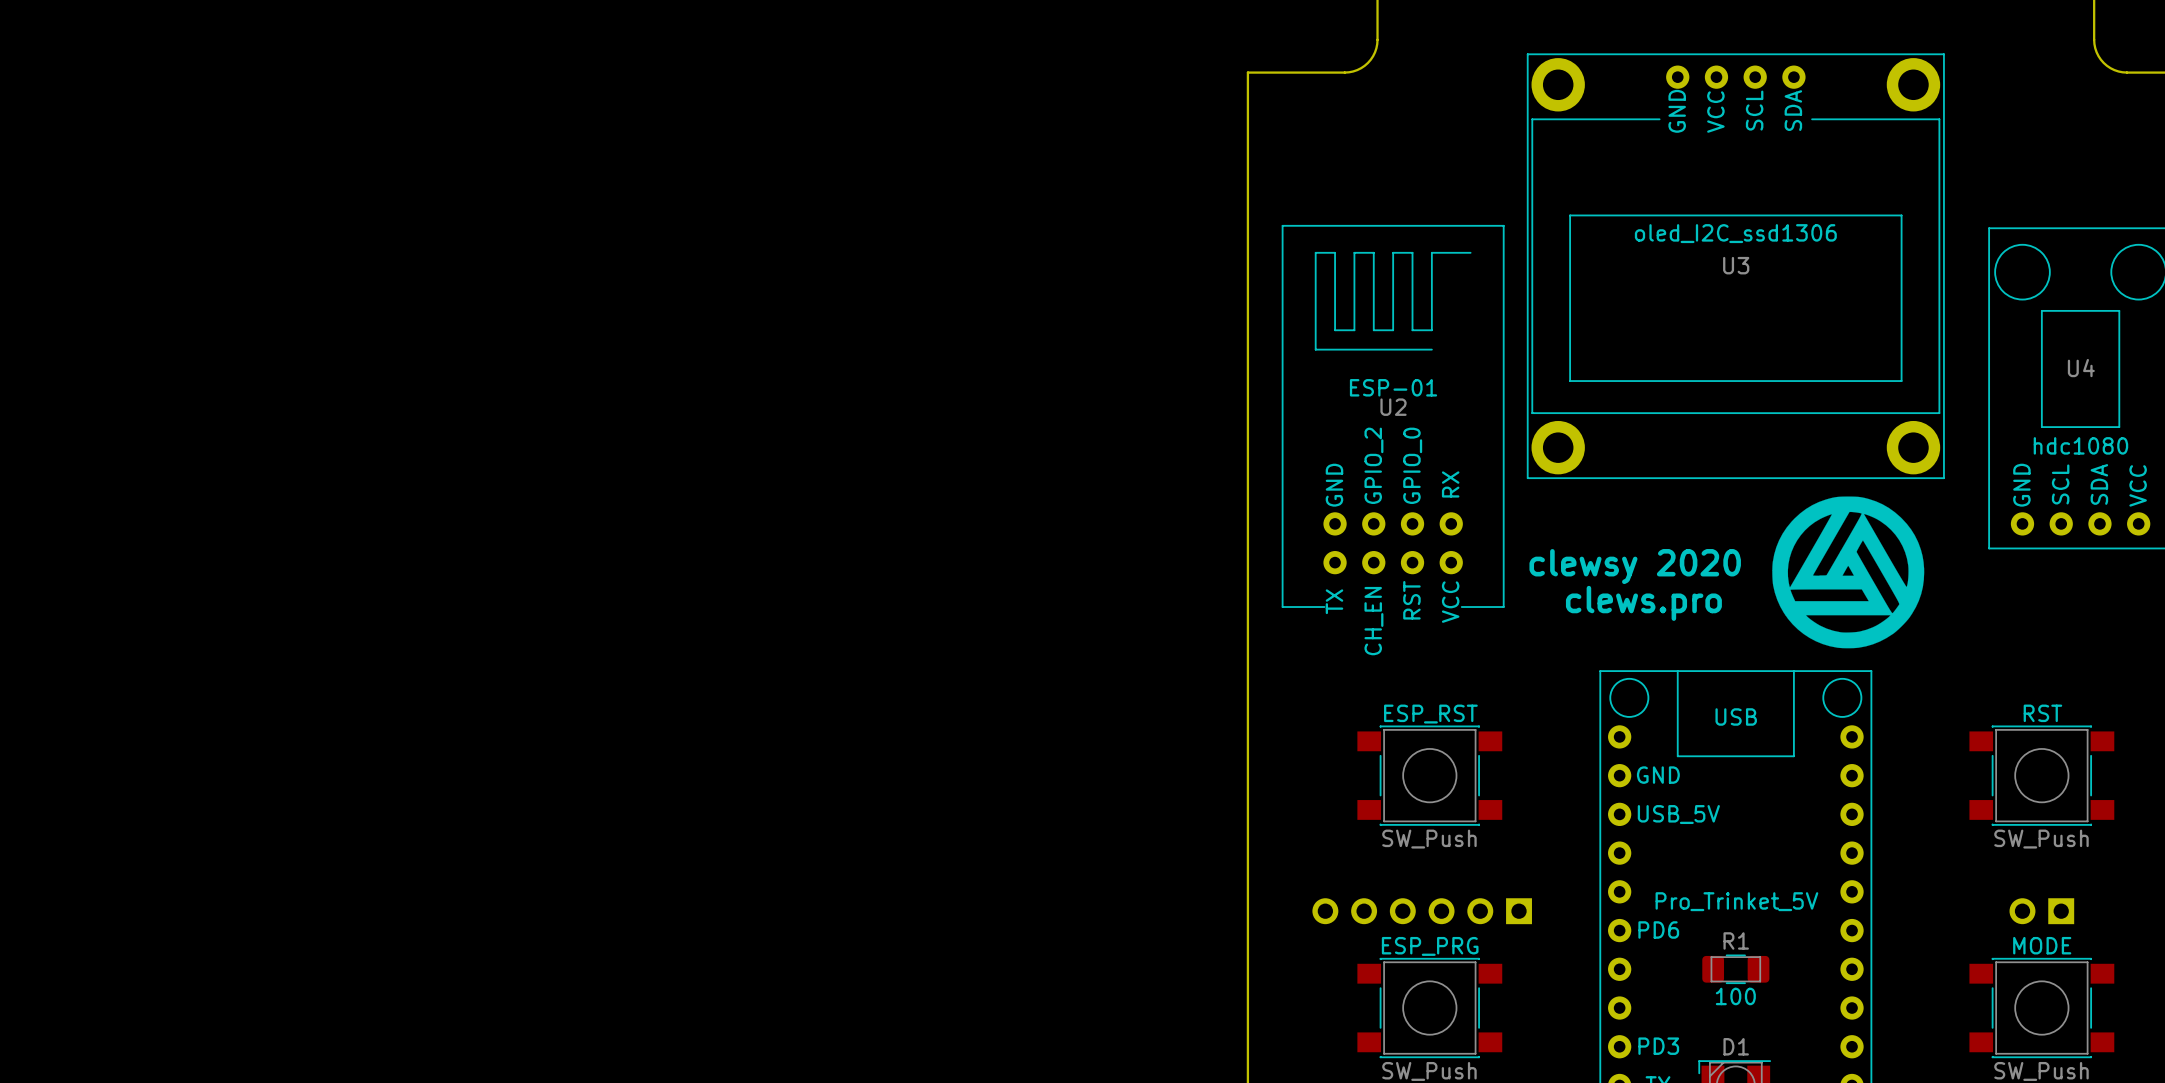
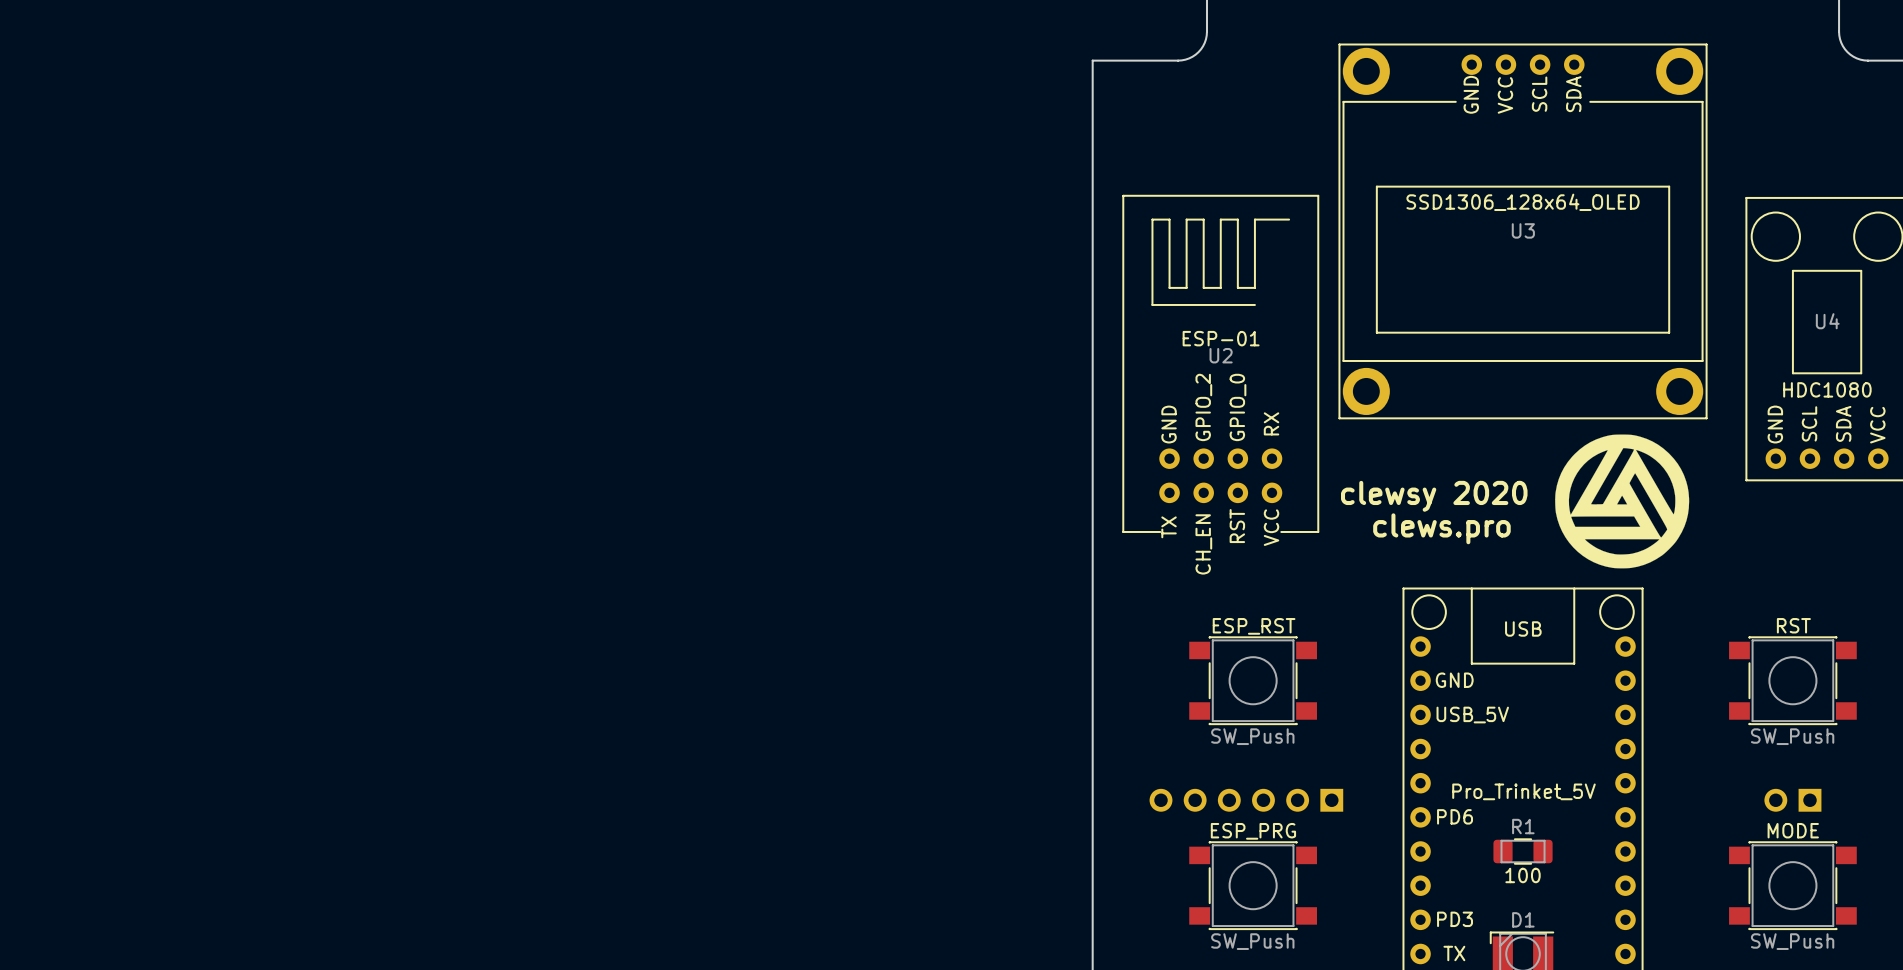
U3 value: oled_I2C_ssd1306 (1735, 233) -> SSD1306_128x64_OLED (1523, 202)
U4 value: hdc1080 (2080, 445) -> HDC1080 (1827, 389)

